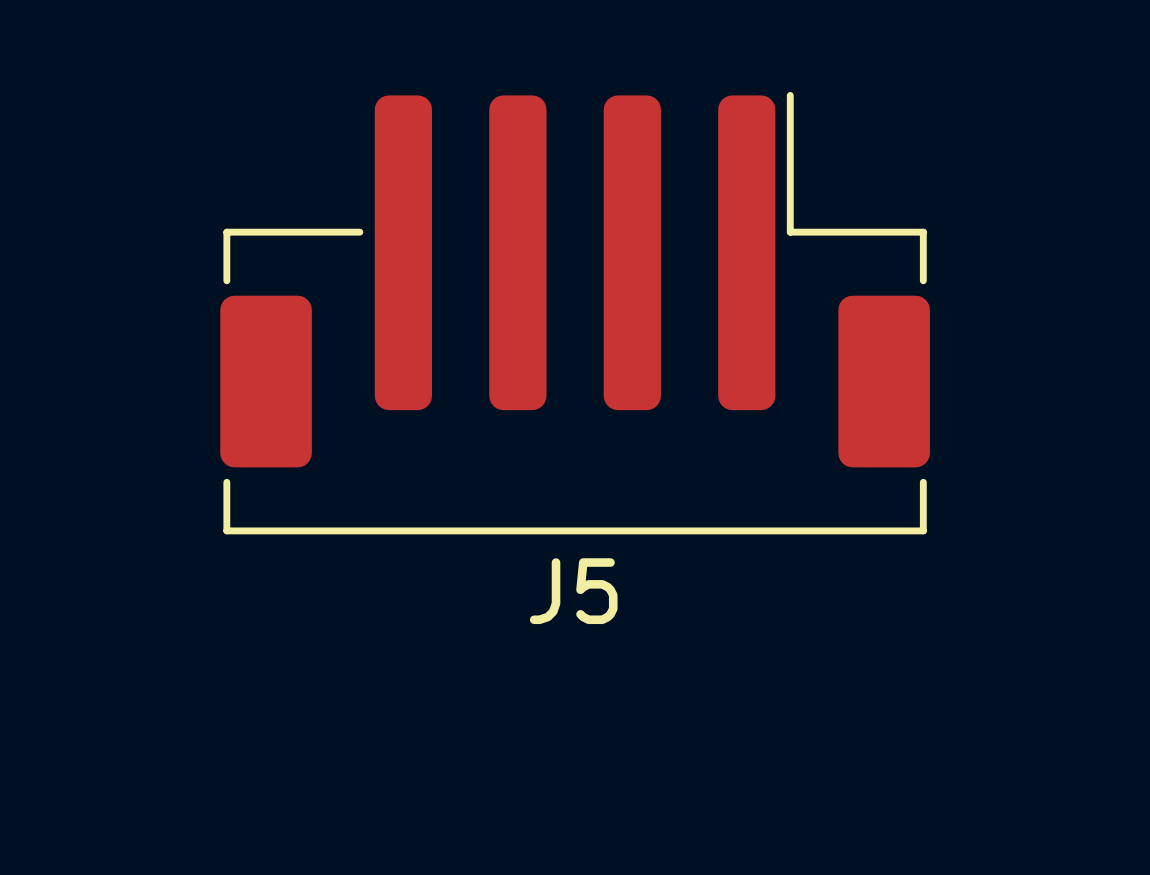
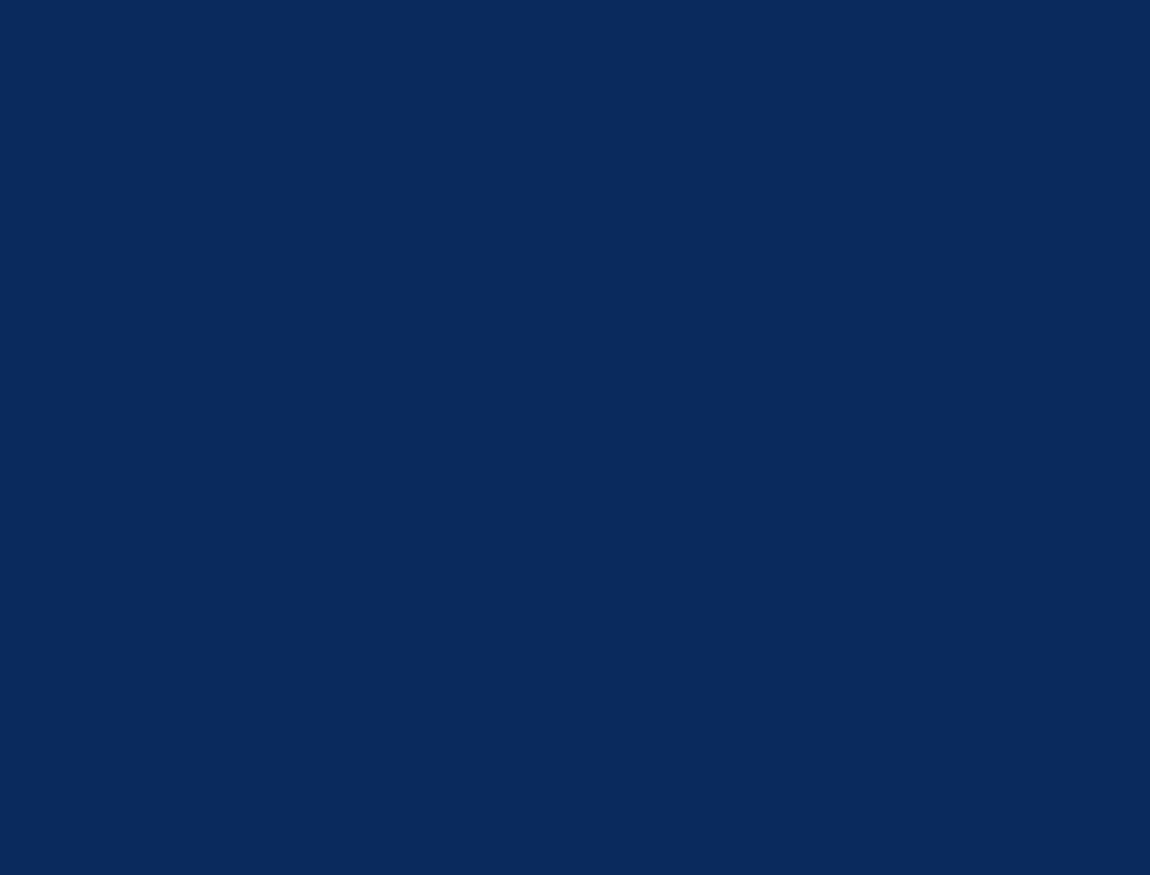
J5: (575, 313) -> none

